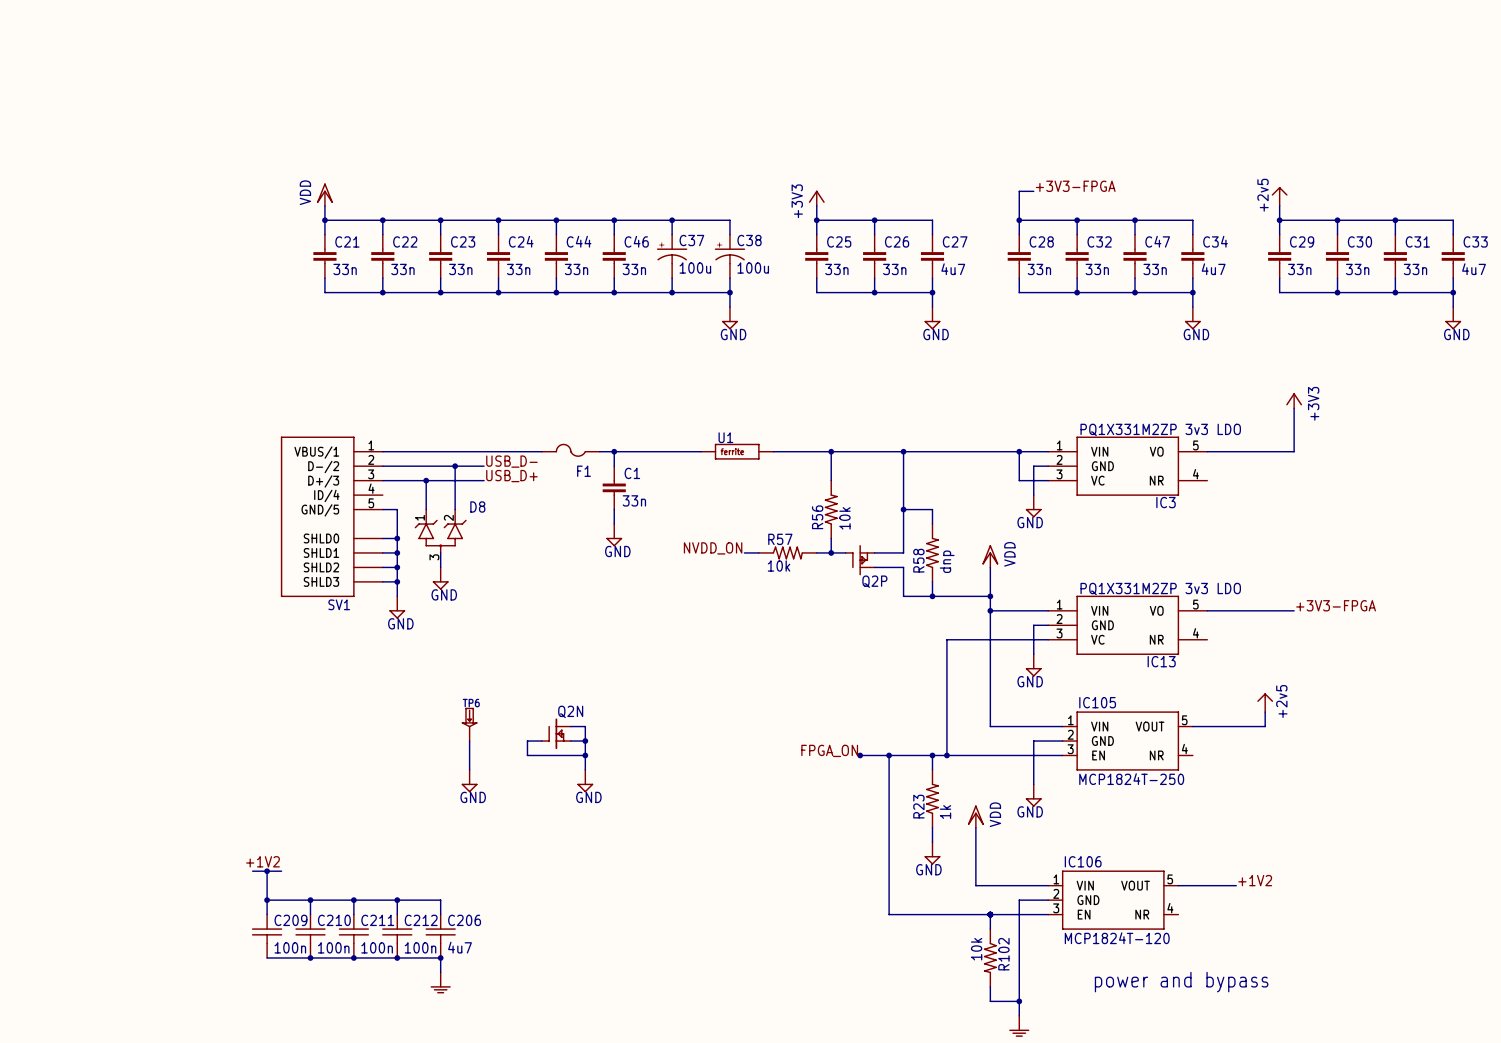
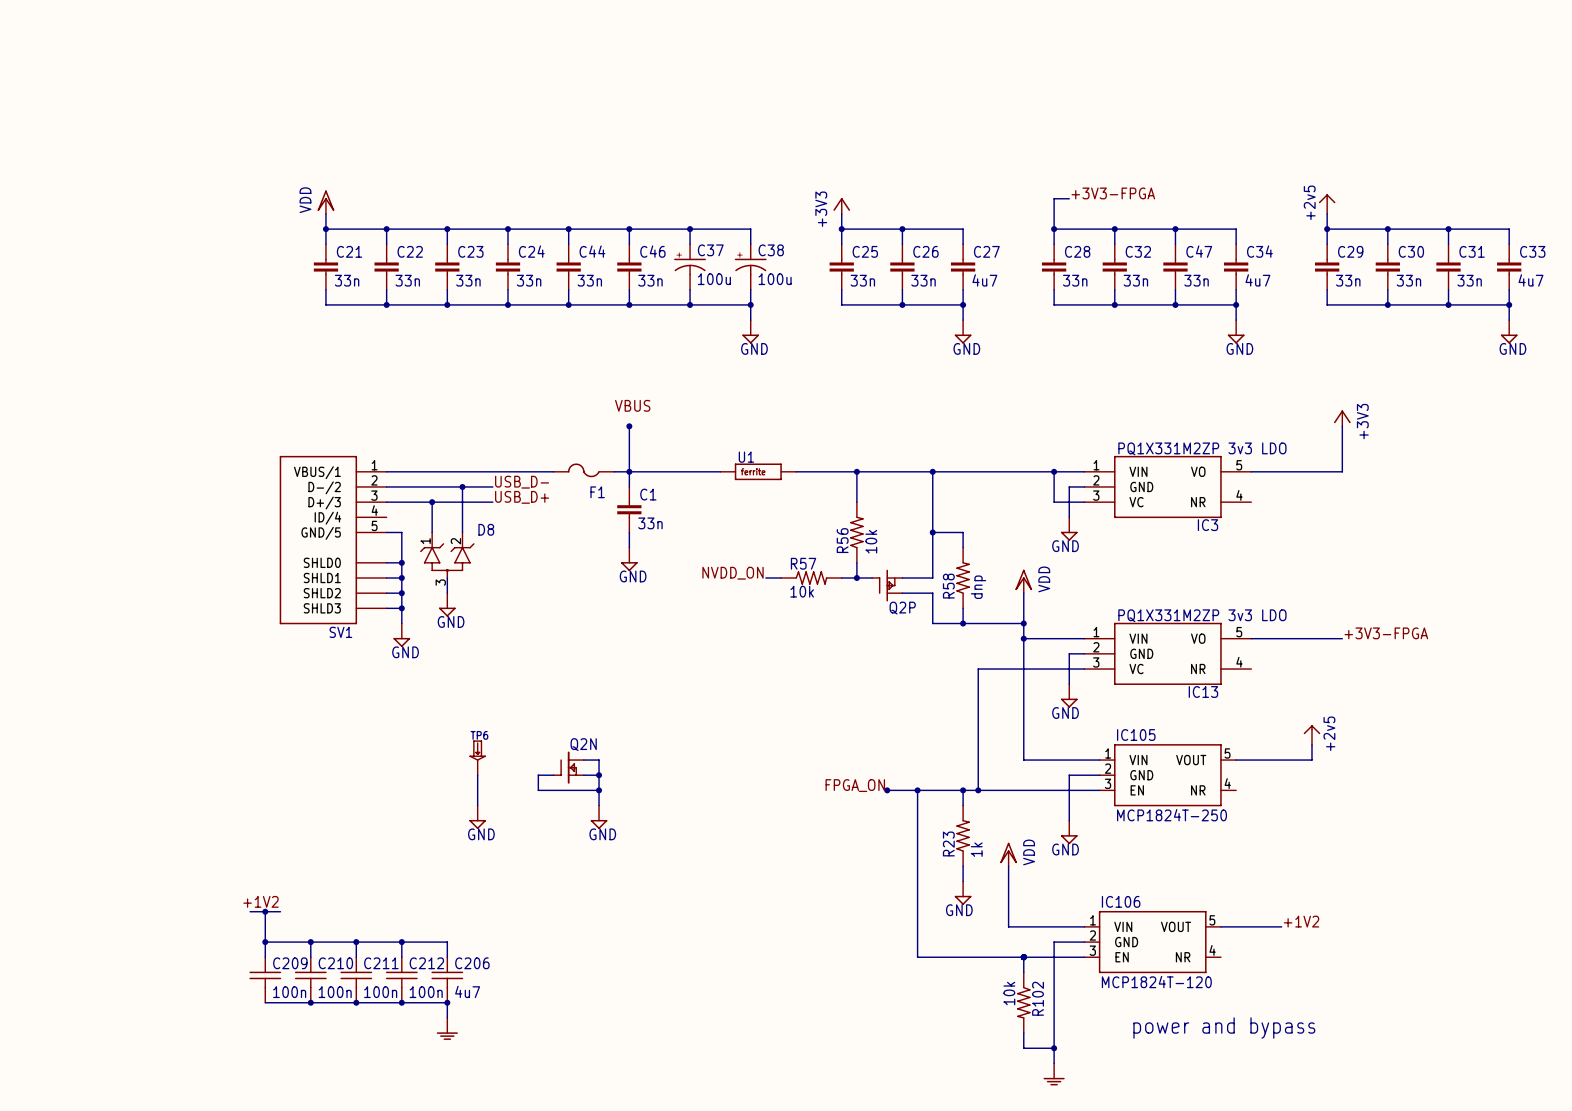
label: none -> VBUS (632, 405)
wire: none -> (629, 426) (629, 471)
junction: none -> (629, 426)

